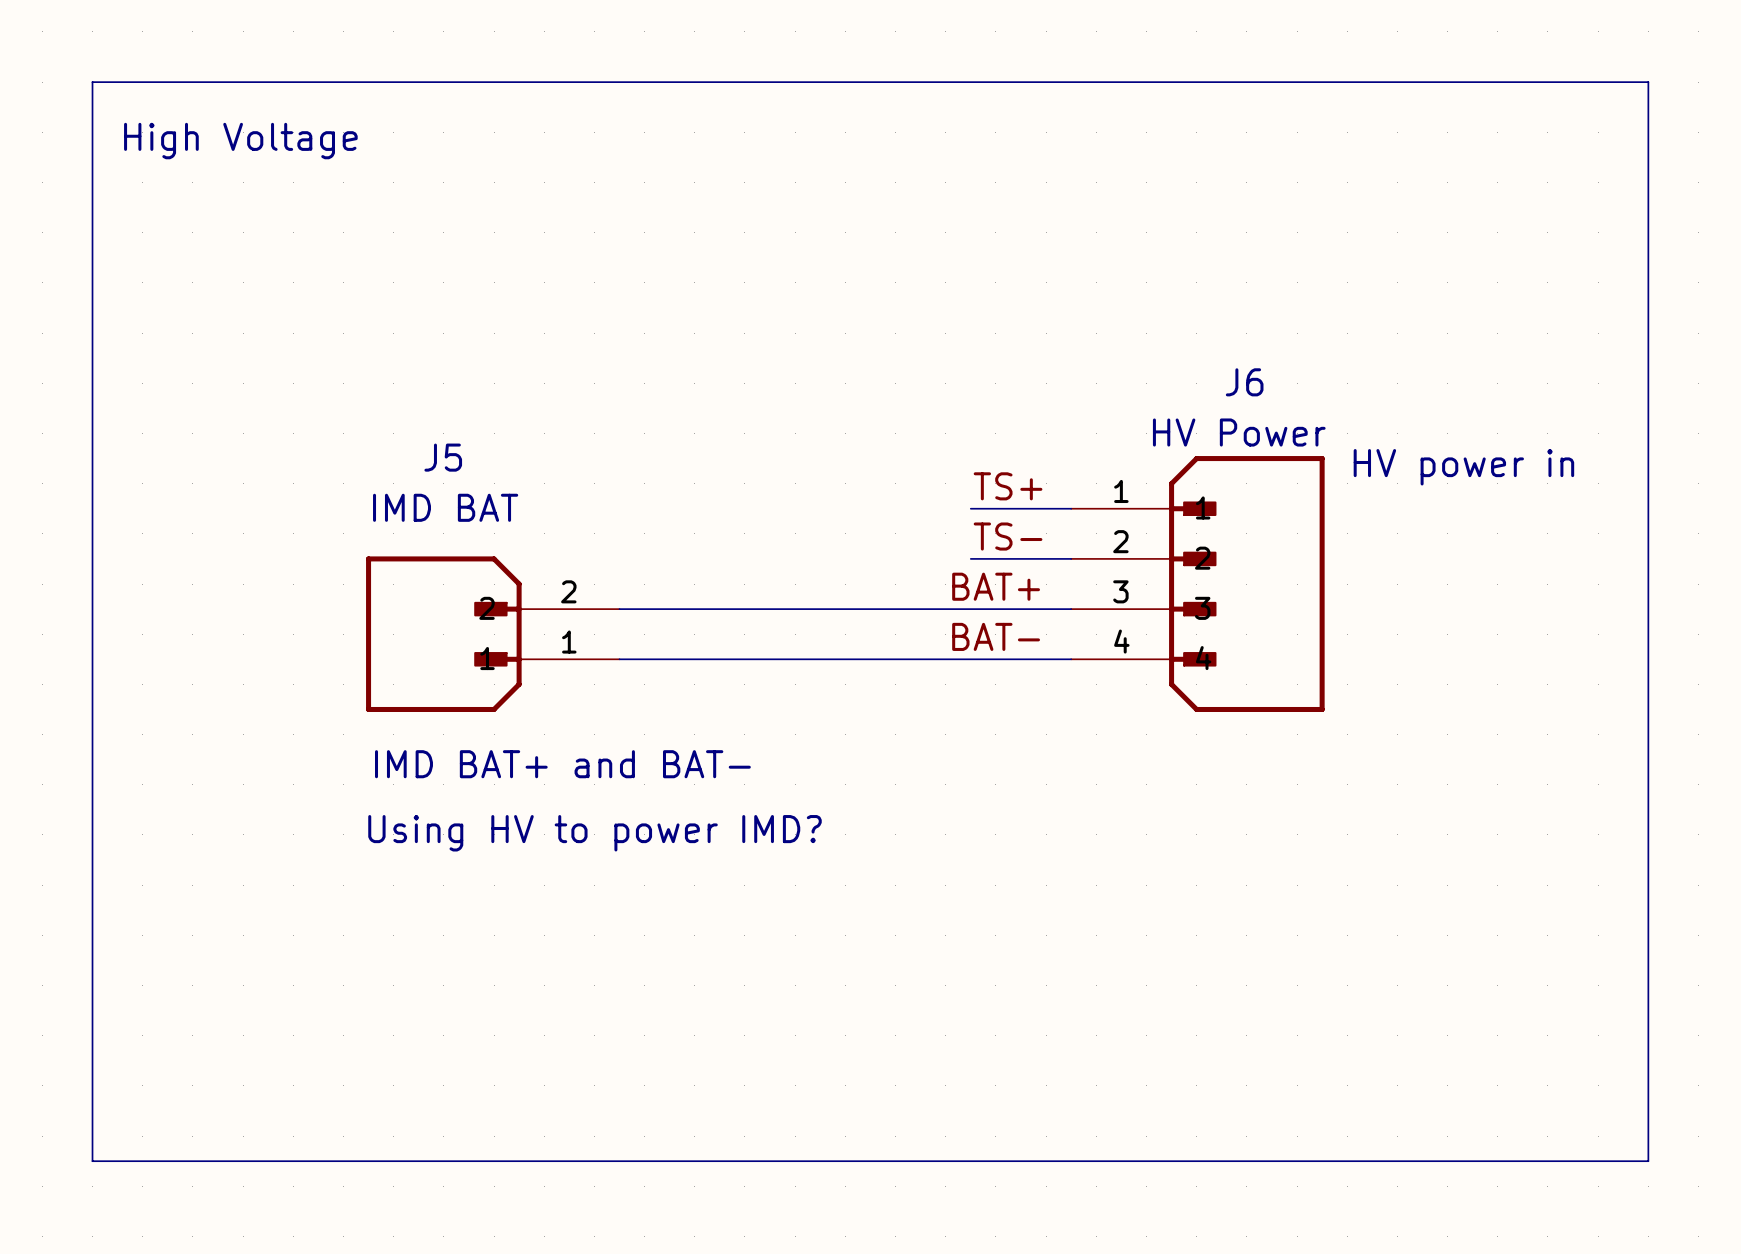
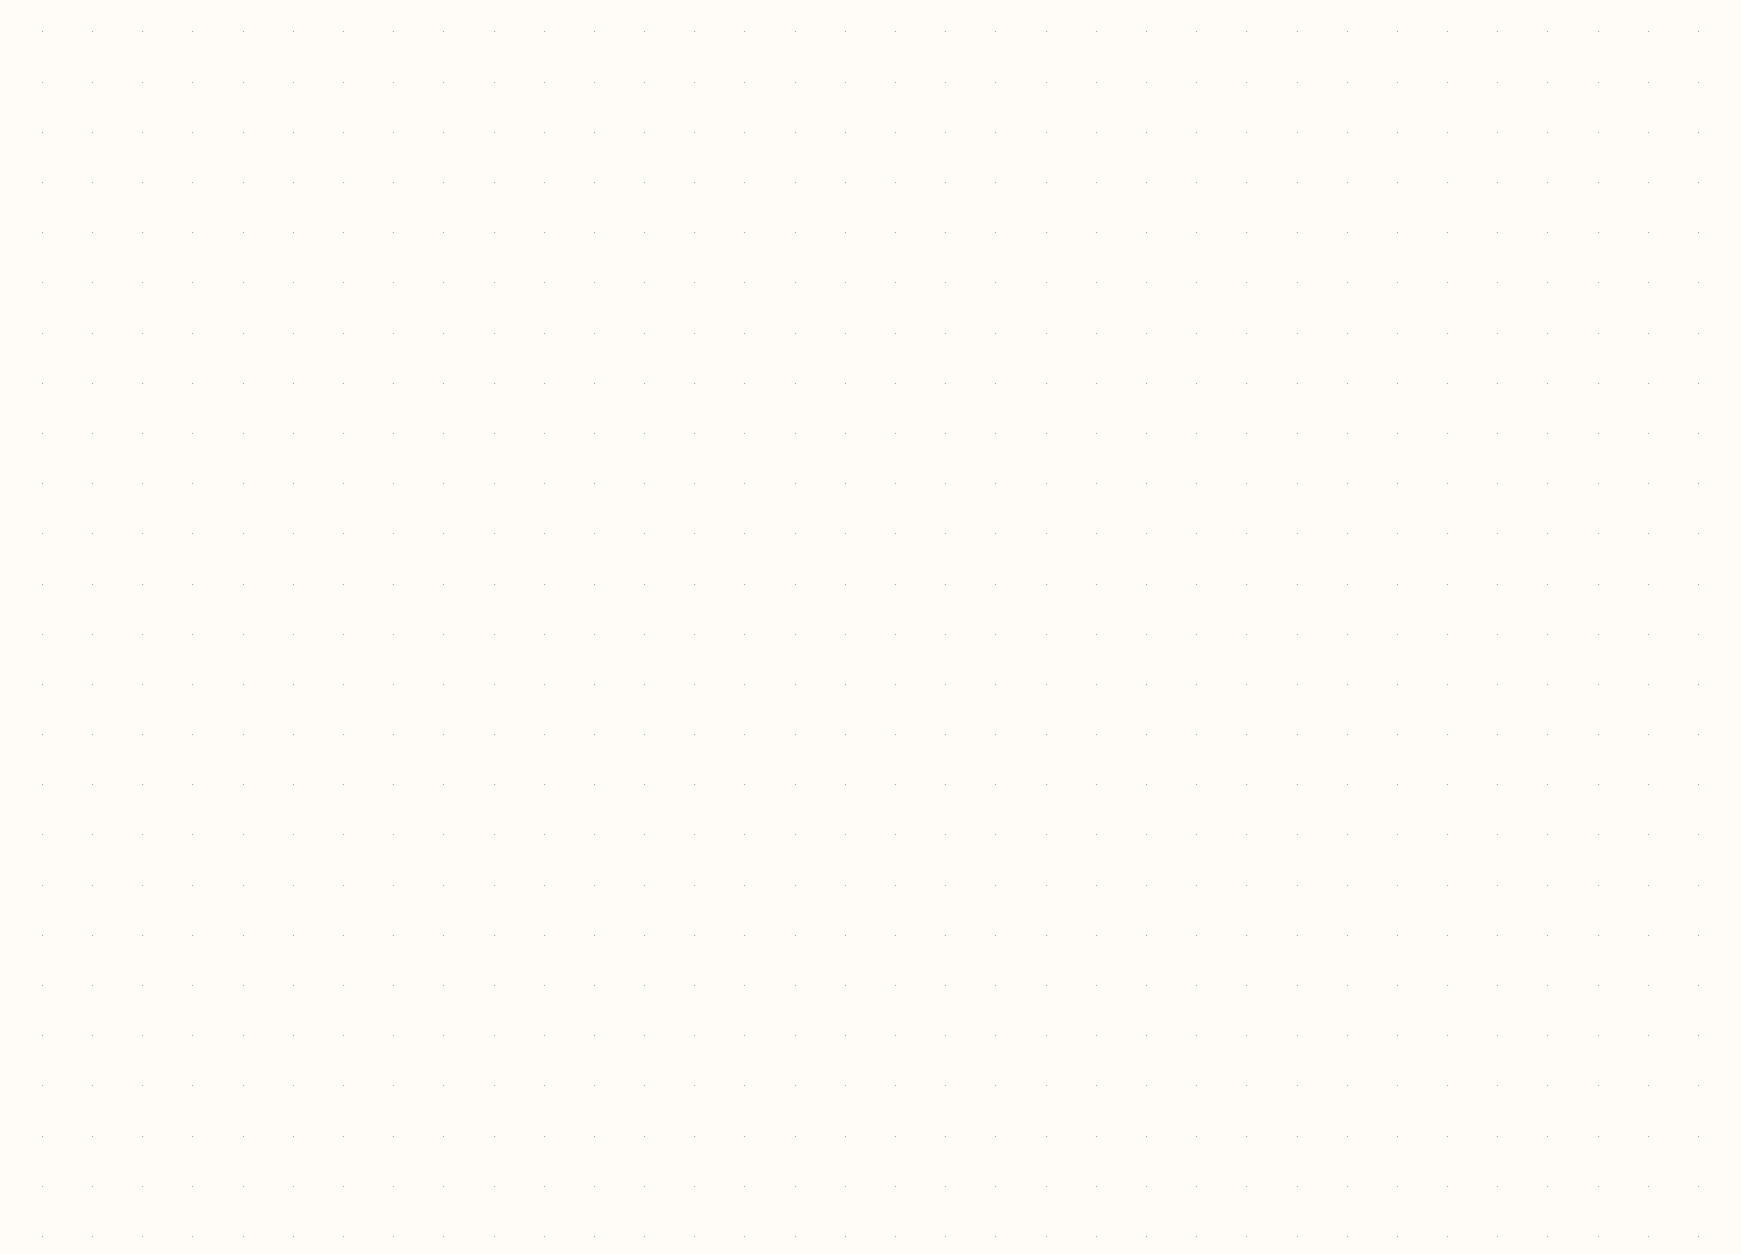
line: (92, 82) (1648, 82) (1648, 1161) (92, 1161) (92, 82) -> none
text: High Voltage (240, 141) -> none
text: HV power in (1463, 467) -> none
label: TS+ (1008, 486) -> none
wire: (970, 508) (1071, 508) -> none
label: TS- (1008, 536) -> none
wire: (970, 558) (1071, 558) -> none
J6: HV Power (1197, 584) -> none
label: BAT+ (996, 586) -> none
wire: (619, 609) (1071, 609) -> none
J5: IMD BAT (492, 634) -> none
label: BAT- (996, 636) -> none
wire: (619, 659) (1071, 659) -> none
text: IMD BAT+ and BAT- (562, 764) -> none
text: Using HV to power IMD? (594, 833) -> none

